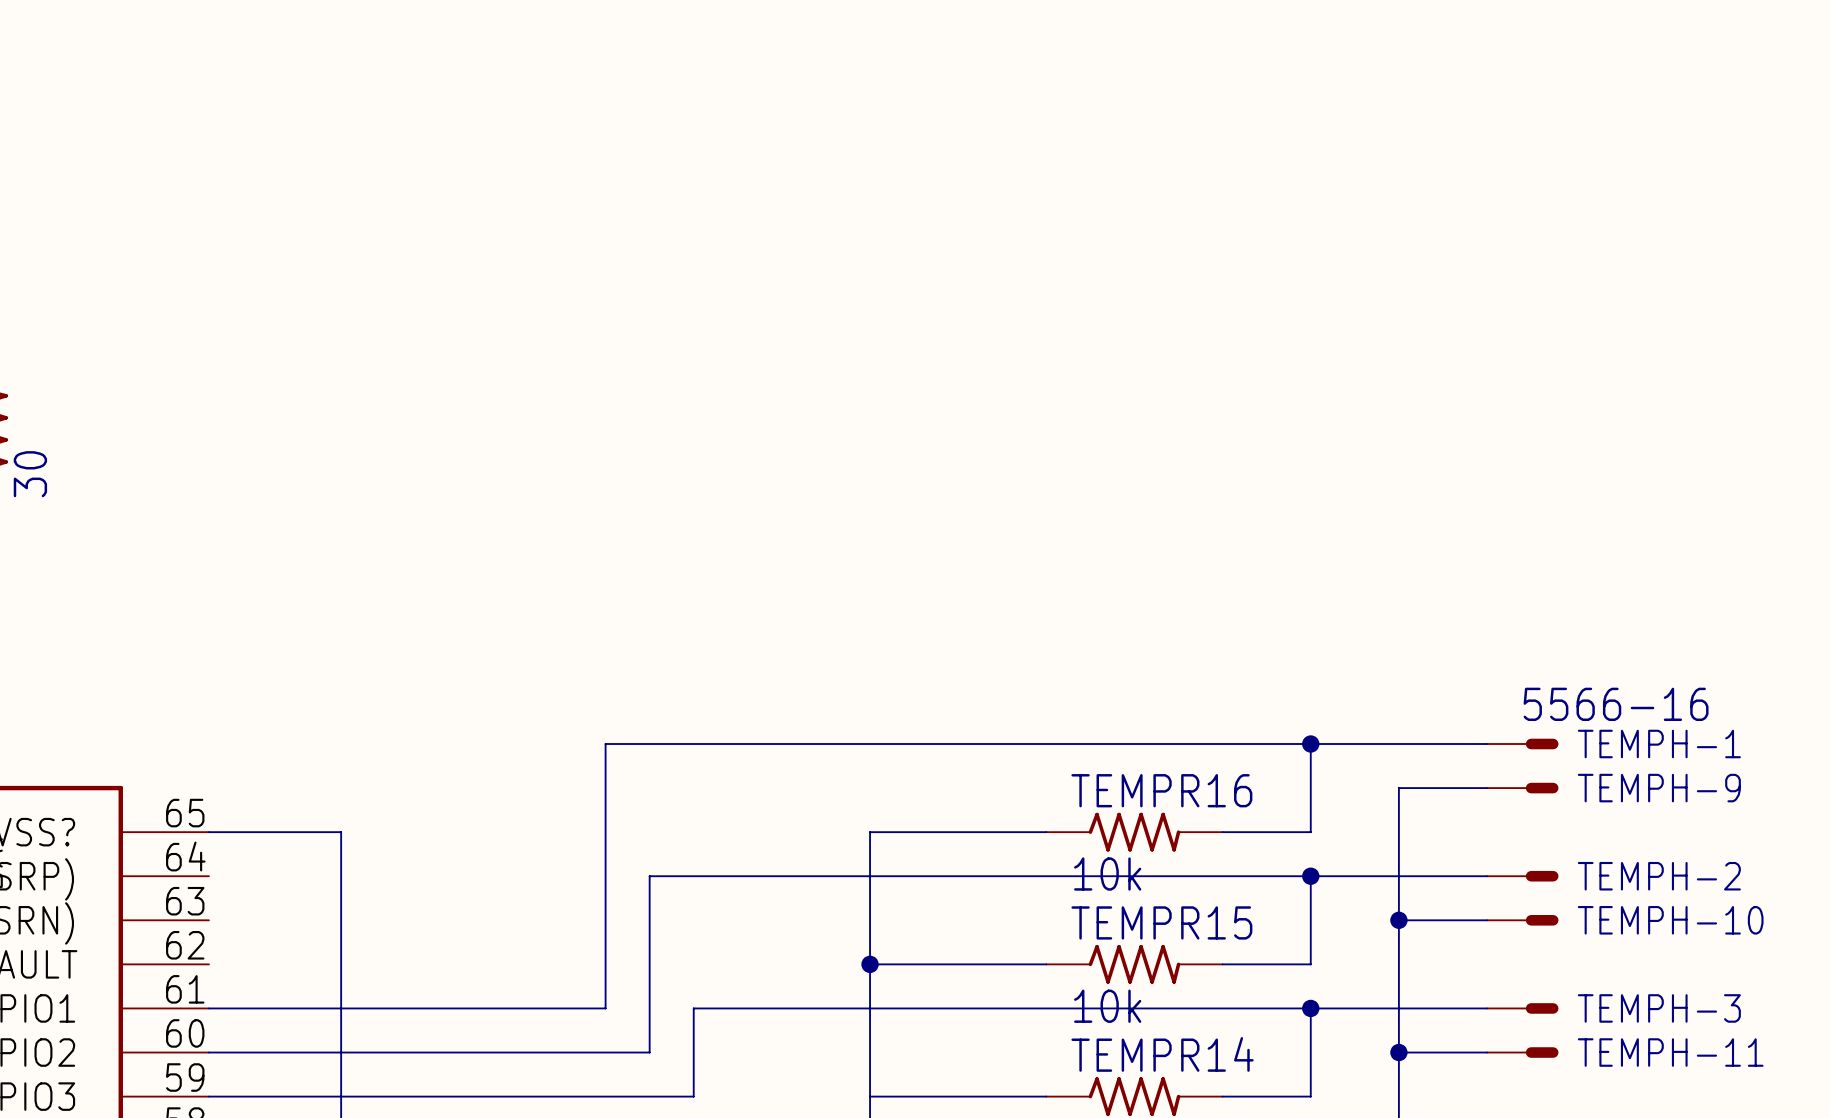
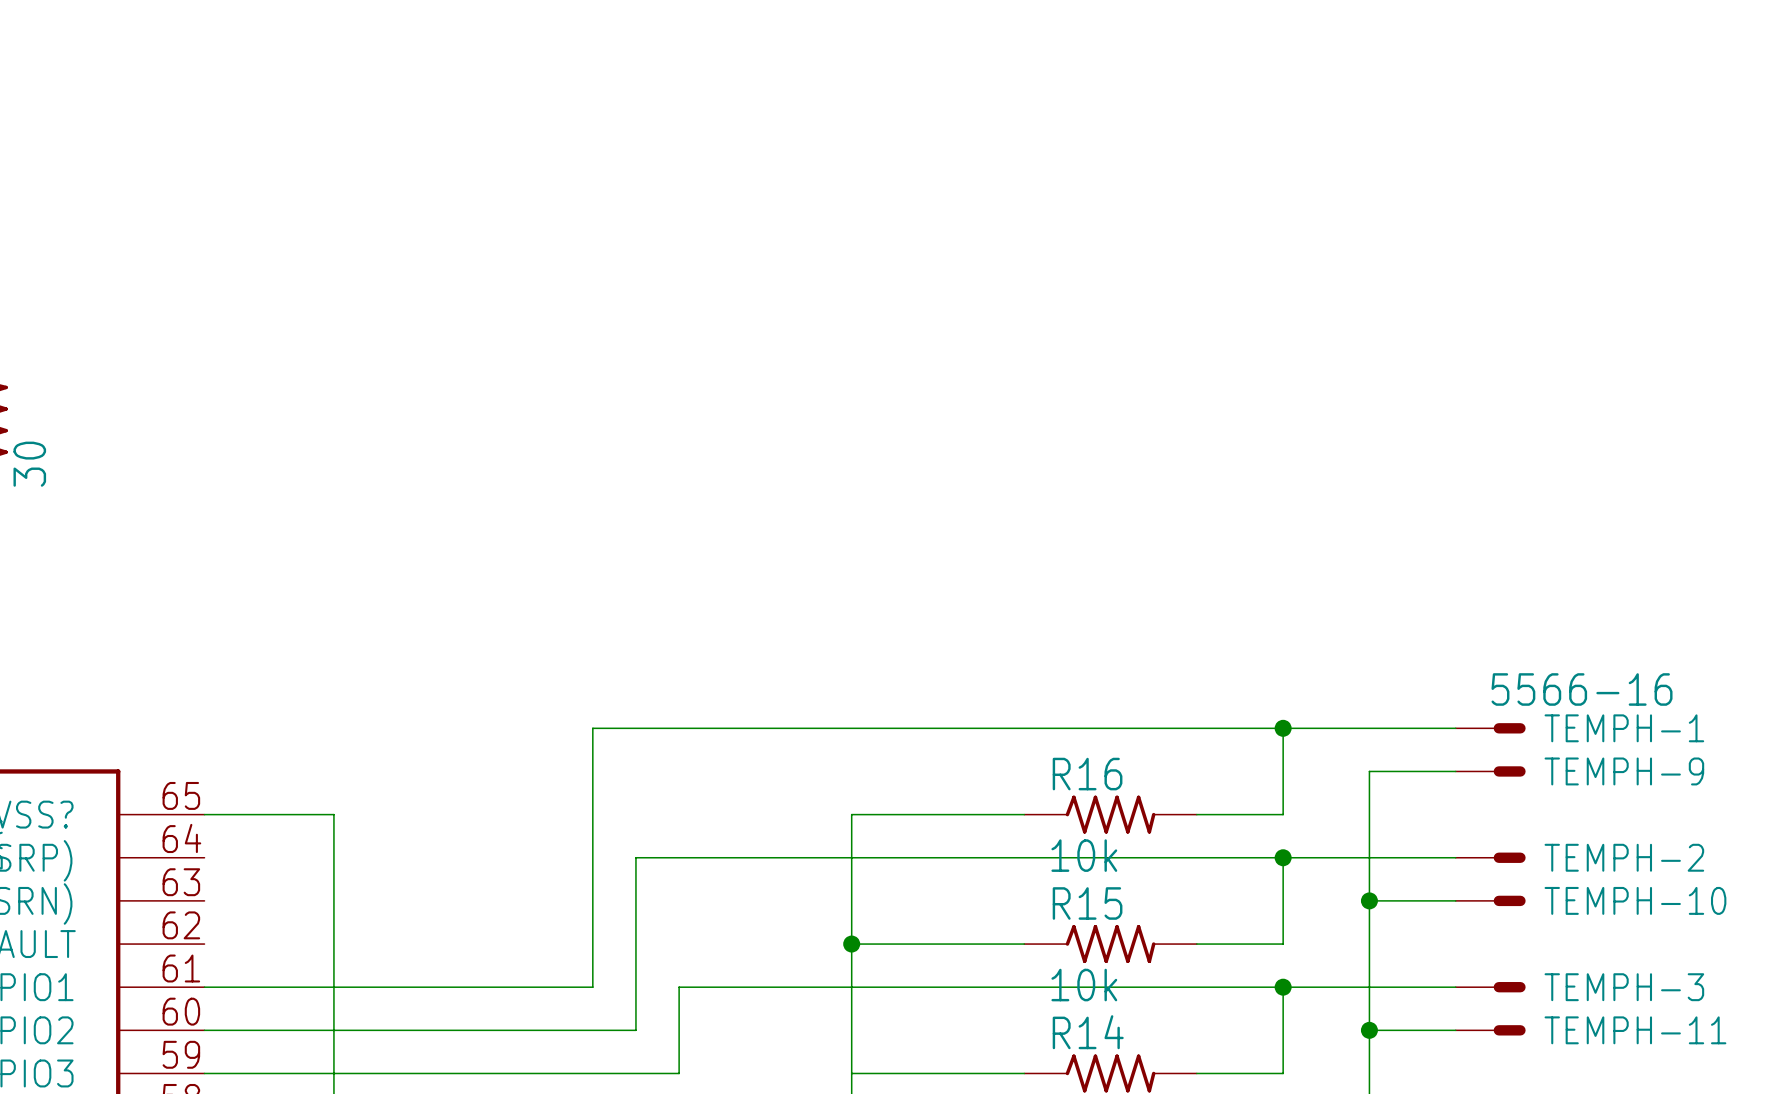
TEMPR16 name: TEMPR16 (1161, 790) -> R16 (1087, 774)
TEMPR15 name: TEMPR15 (1161, 922) -> R15 (1087, 903)
TEMPR14 name: TEMPR14 (1162, 1054) -> R14 (1088, 1032)

